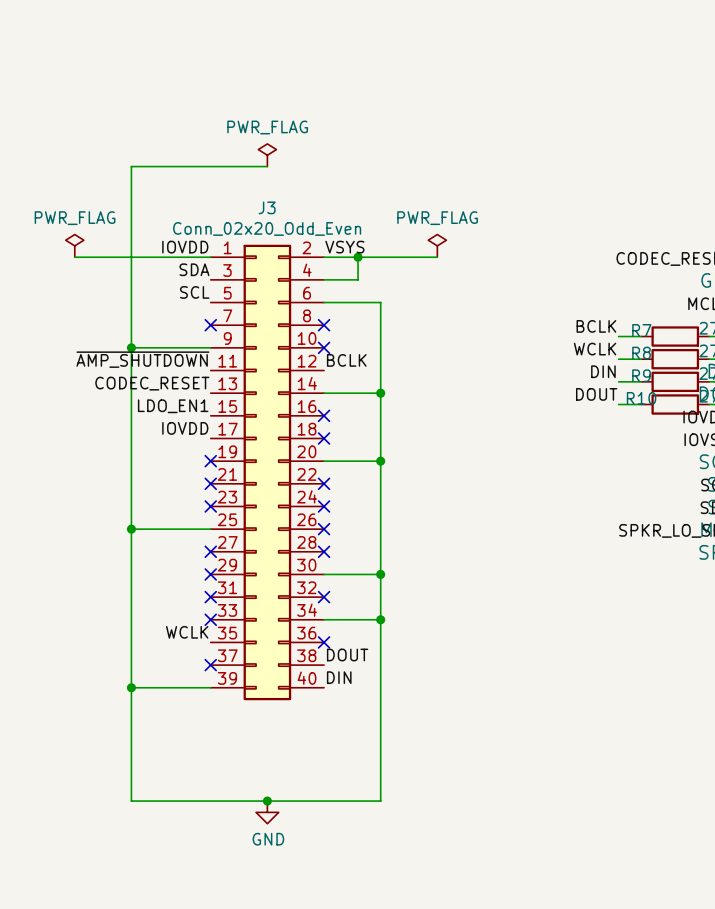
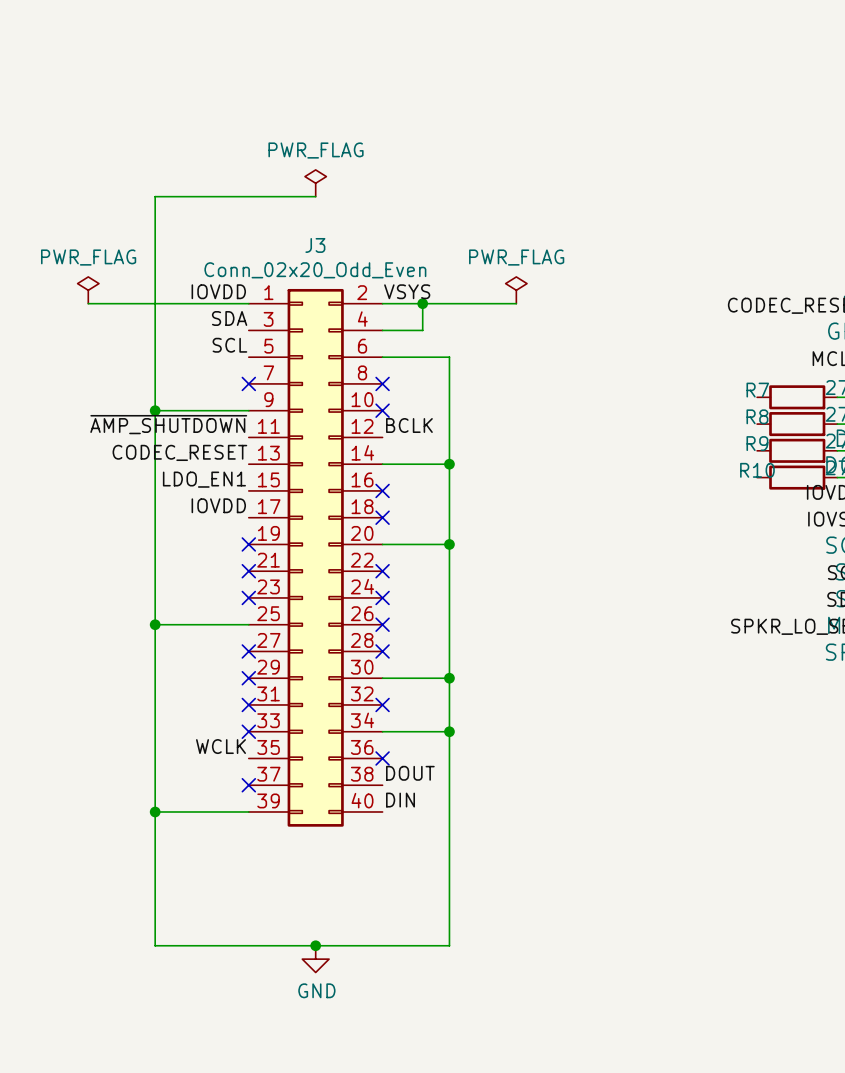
label: BCLK (596, 326) -> none
wire: (618, 336) (641, 336) -> none
label: WCLK (595, 349) -> none
wire: (618, 359) (641, 359) -> none
label: DIN (603, 371) -> none
wire: (618, 381) (641, 381) -> none
label: DOUT (596, 394) -> none
wire: (618, 404) (641, 404) -> none

